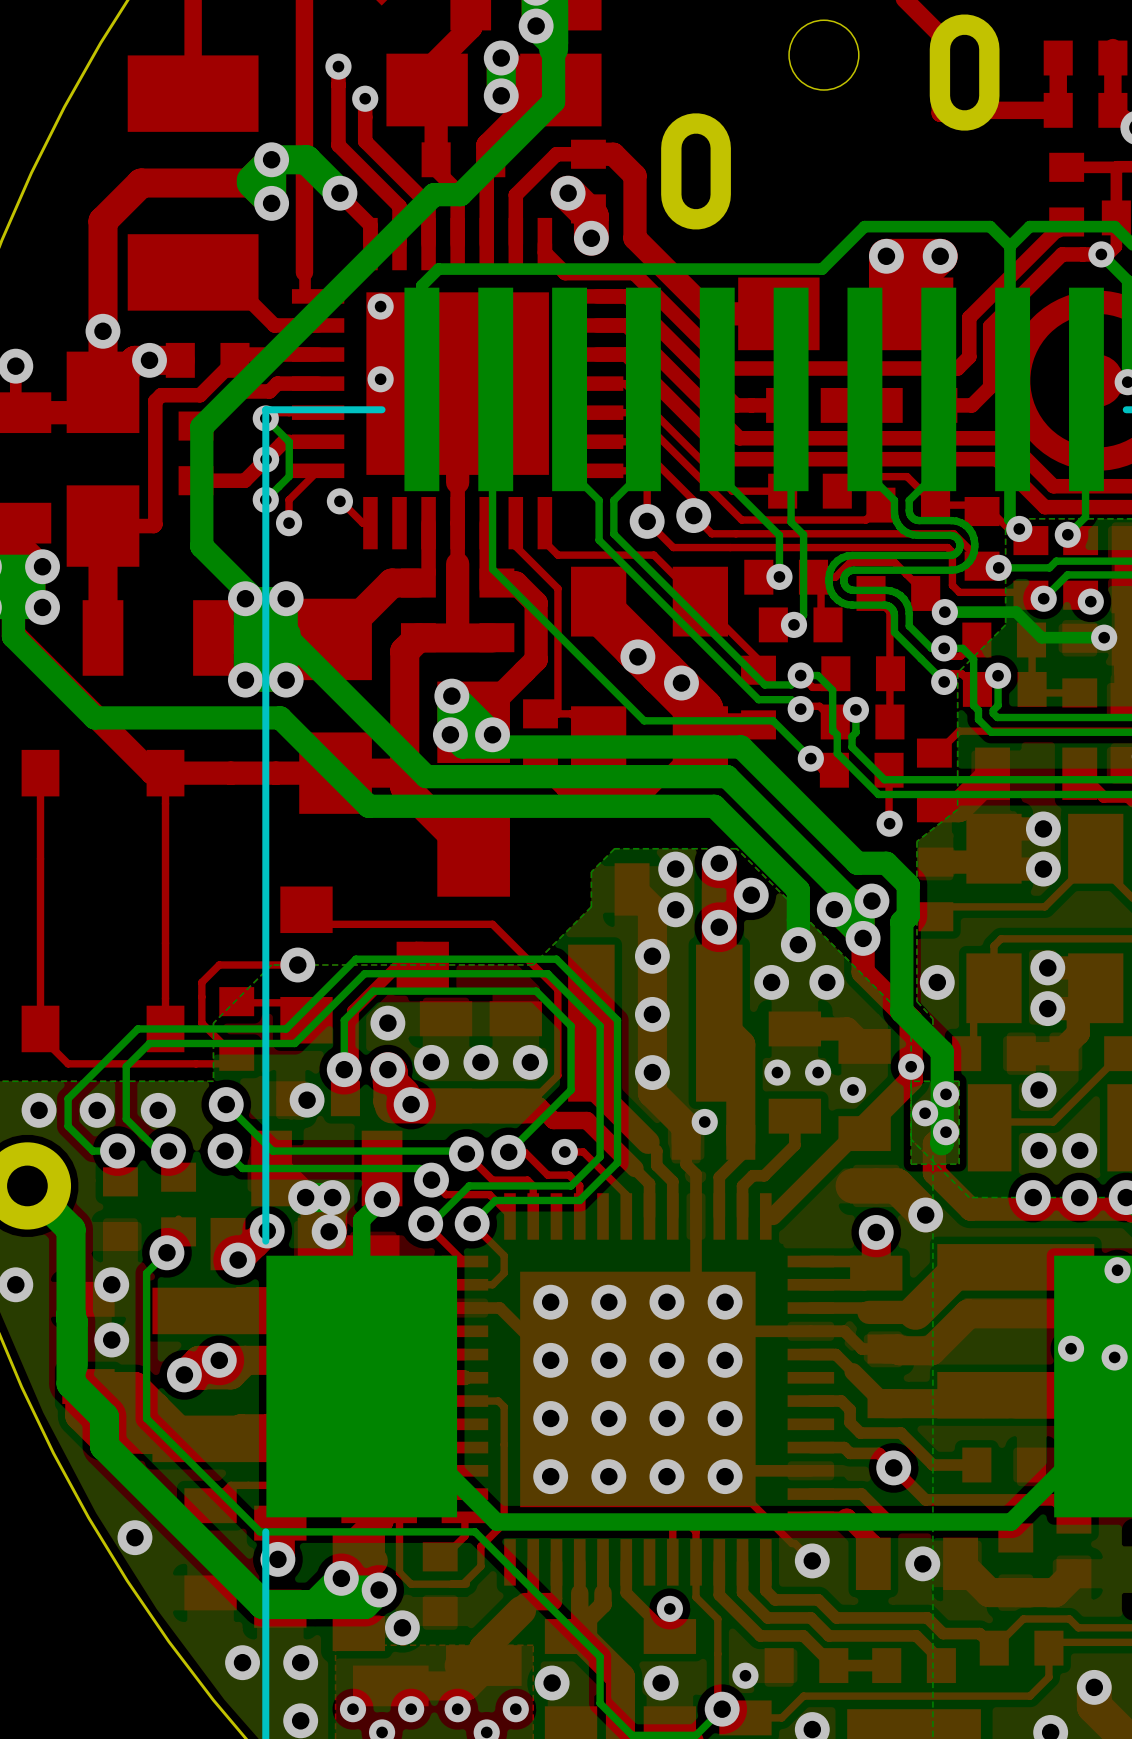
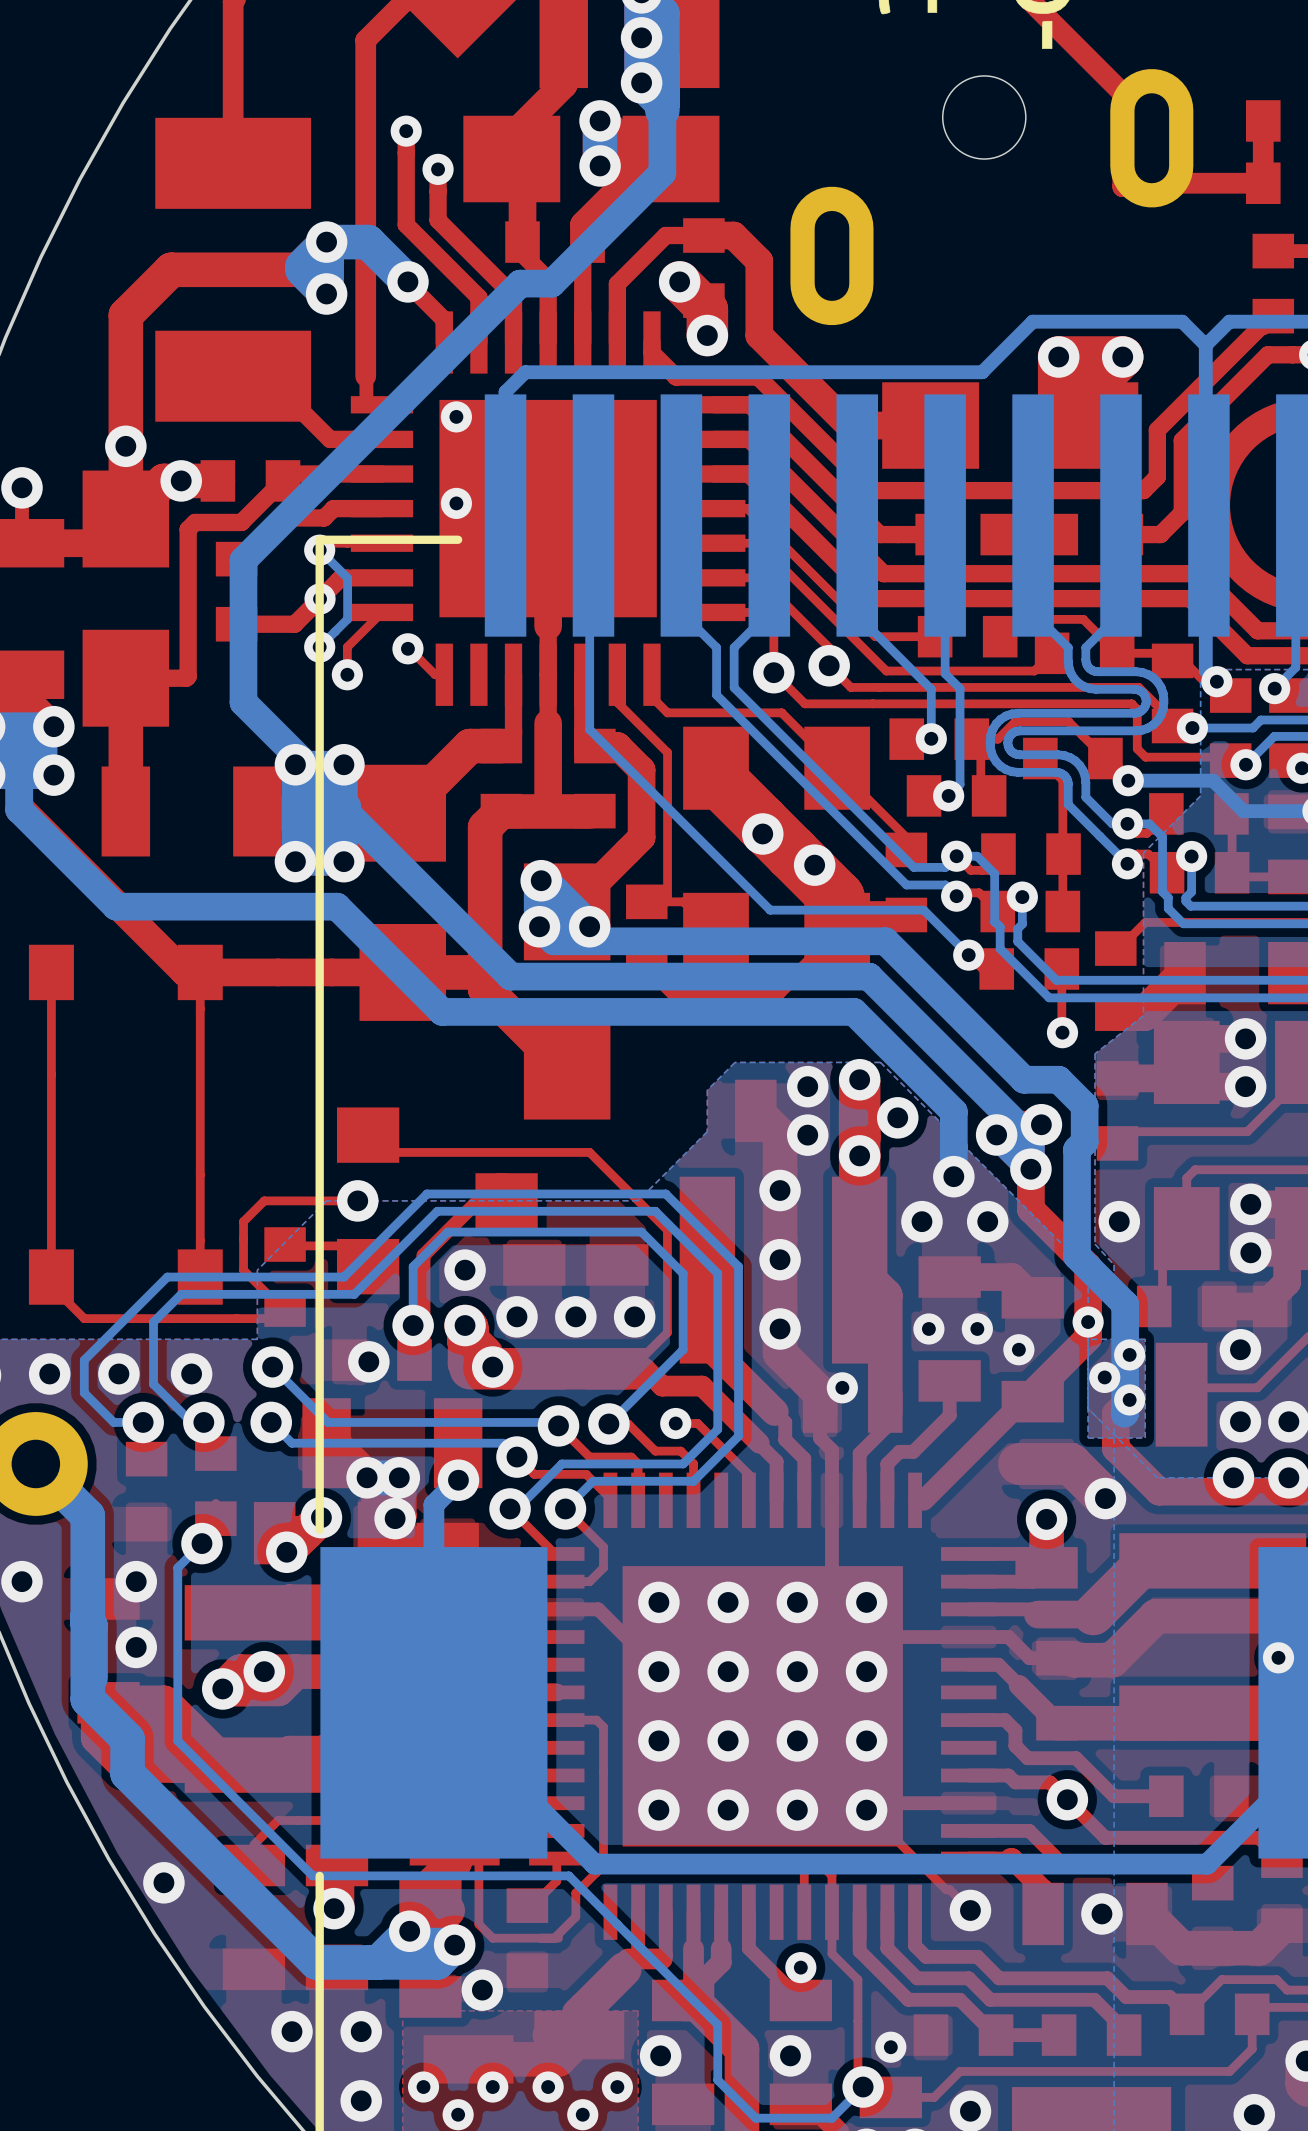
part position: (210, 1549) -> (253, 1917)

